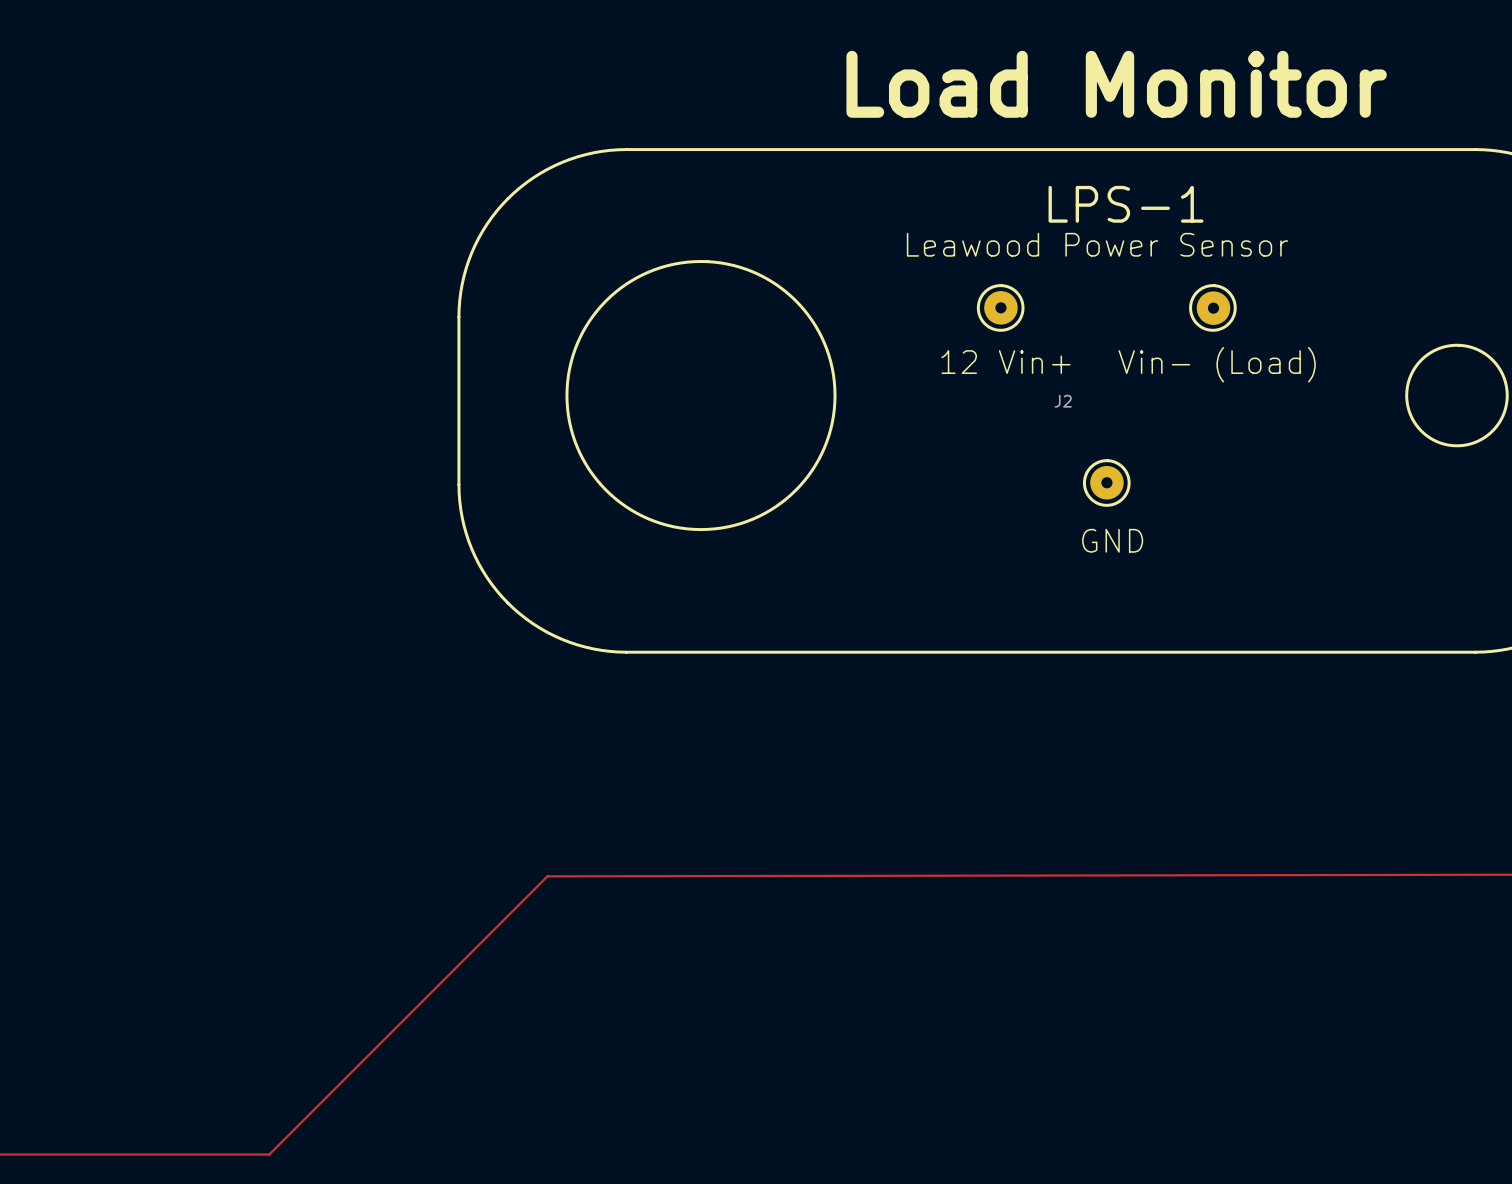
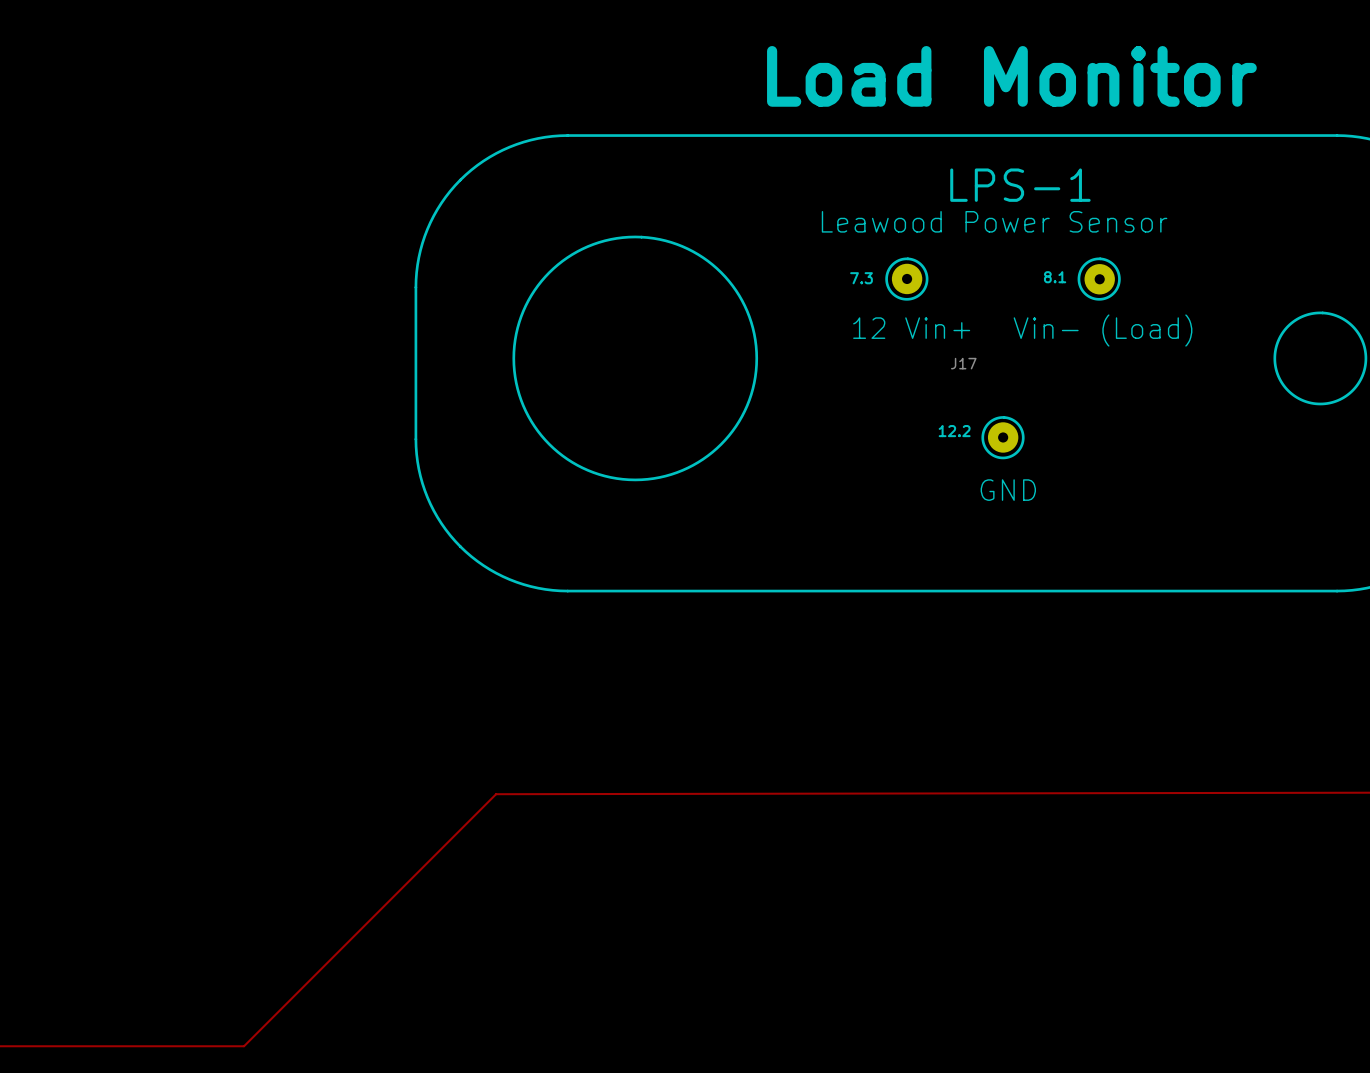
text: none -> 8.1 (1055, 277)
text: none -> 7.3 (861, 278)
J2 name: J2 (1063, 401) -> J17 (963, 363)
text: none -> 12.2 (954, 431)

